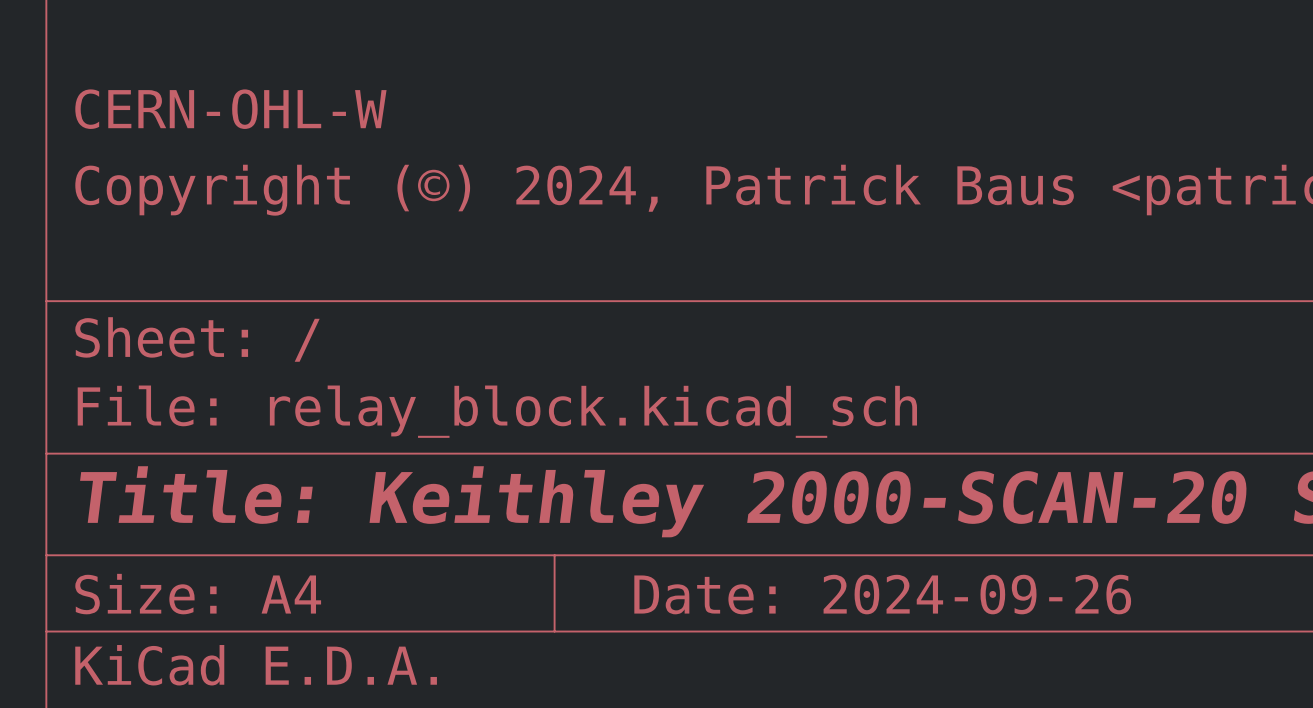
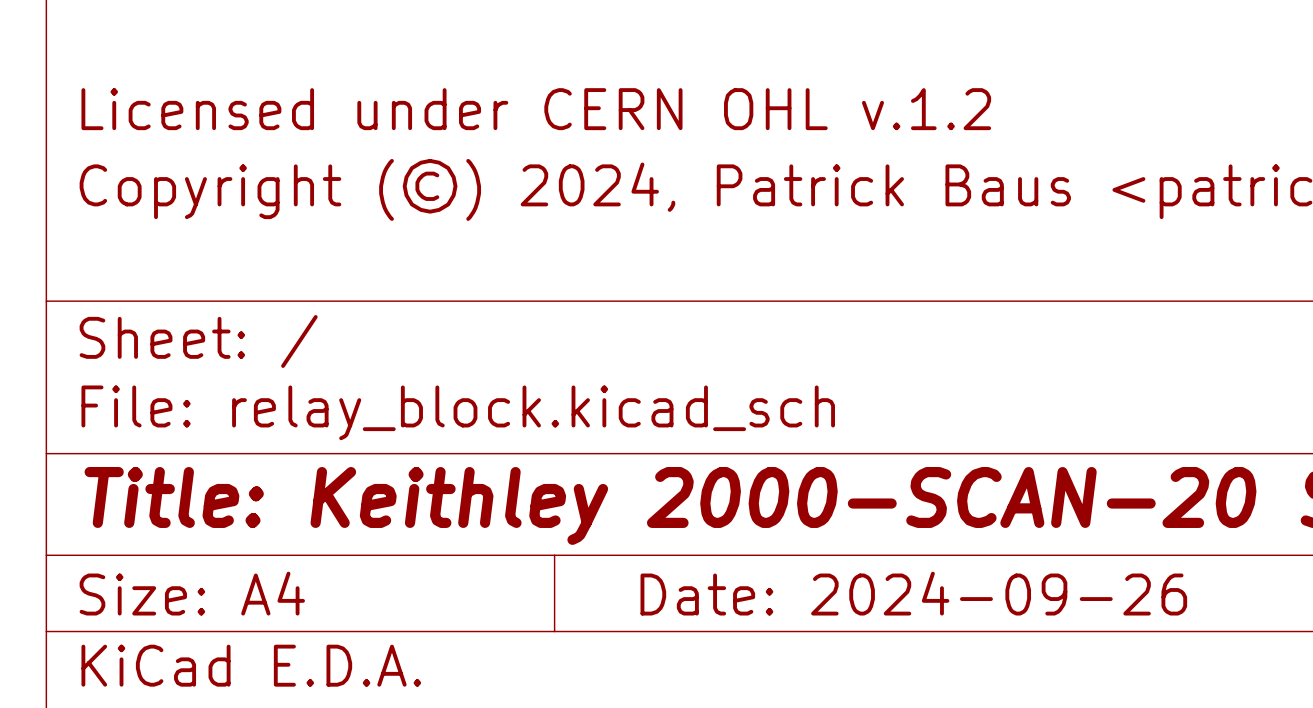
title block: CERN-OHL-W (230, 109) -> Licensed under CERN OHL v.1.2 (536, 109)

